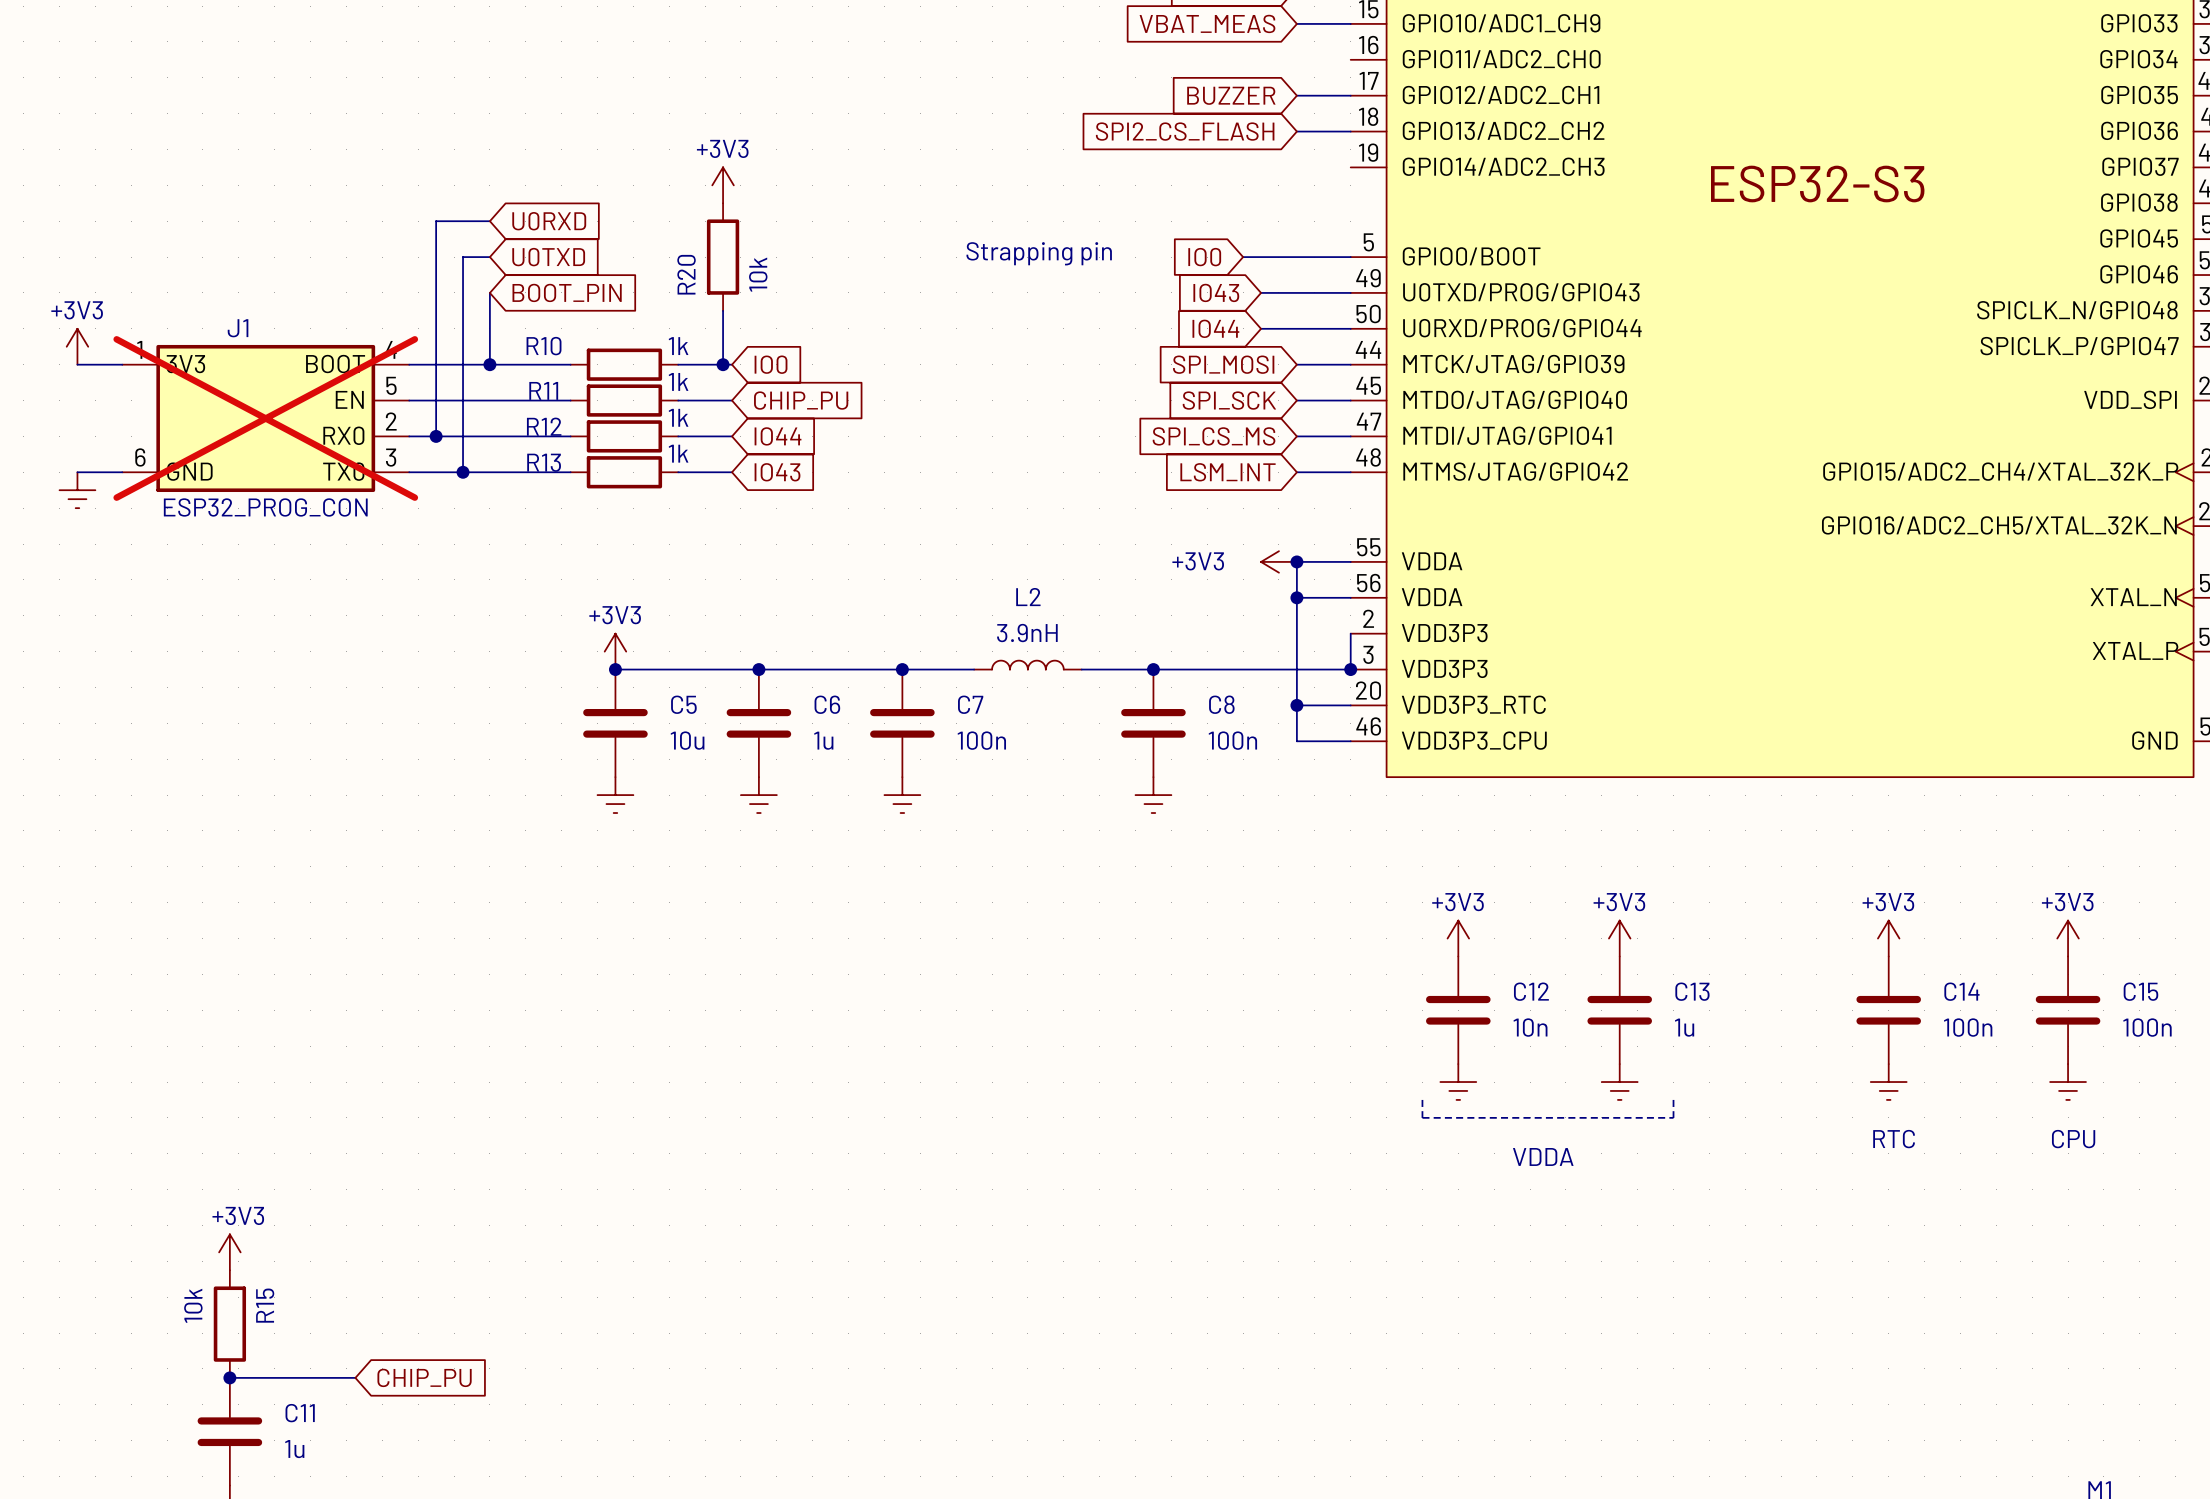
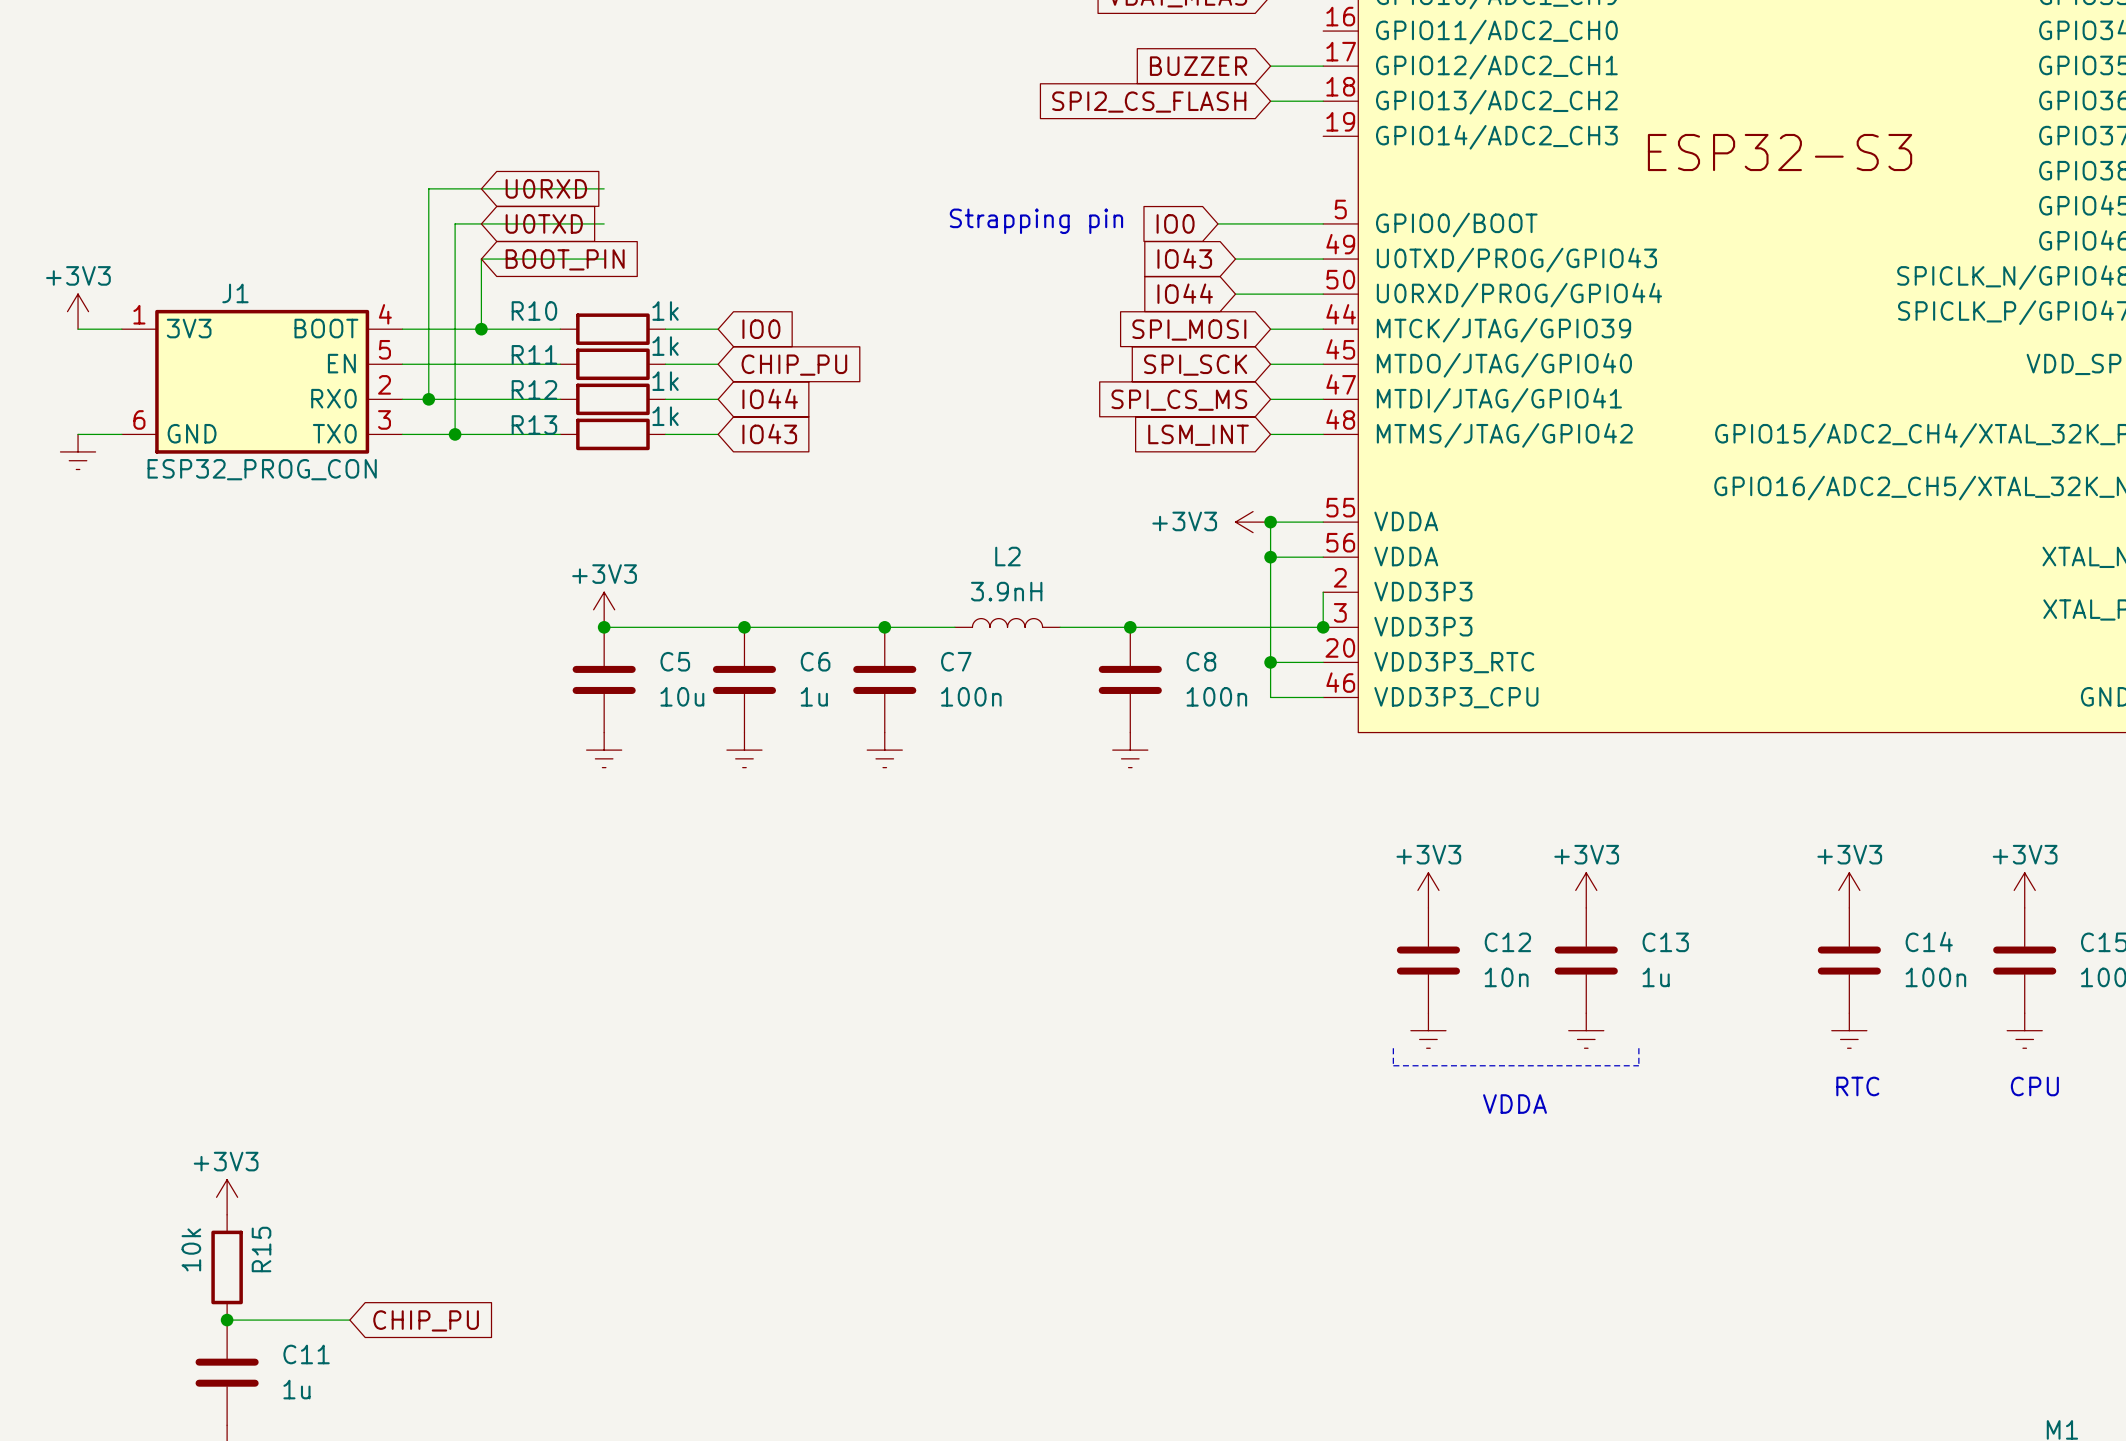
power symbol: +3V3 (723, 185) -> none
wire: none -> (481, 188) (604, 188)
wire: none -> (481, 223) (604, 223)
R20: 10k (723, 257) -> none
wire: none -> (481, 259) (604, 259)
wire: (723, 310) (723, 364) -> none
junction: (723, 364) -> none
J1 do-not-place cross: (265, 418) -> none

